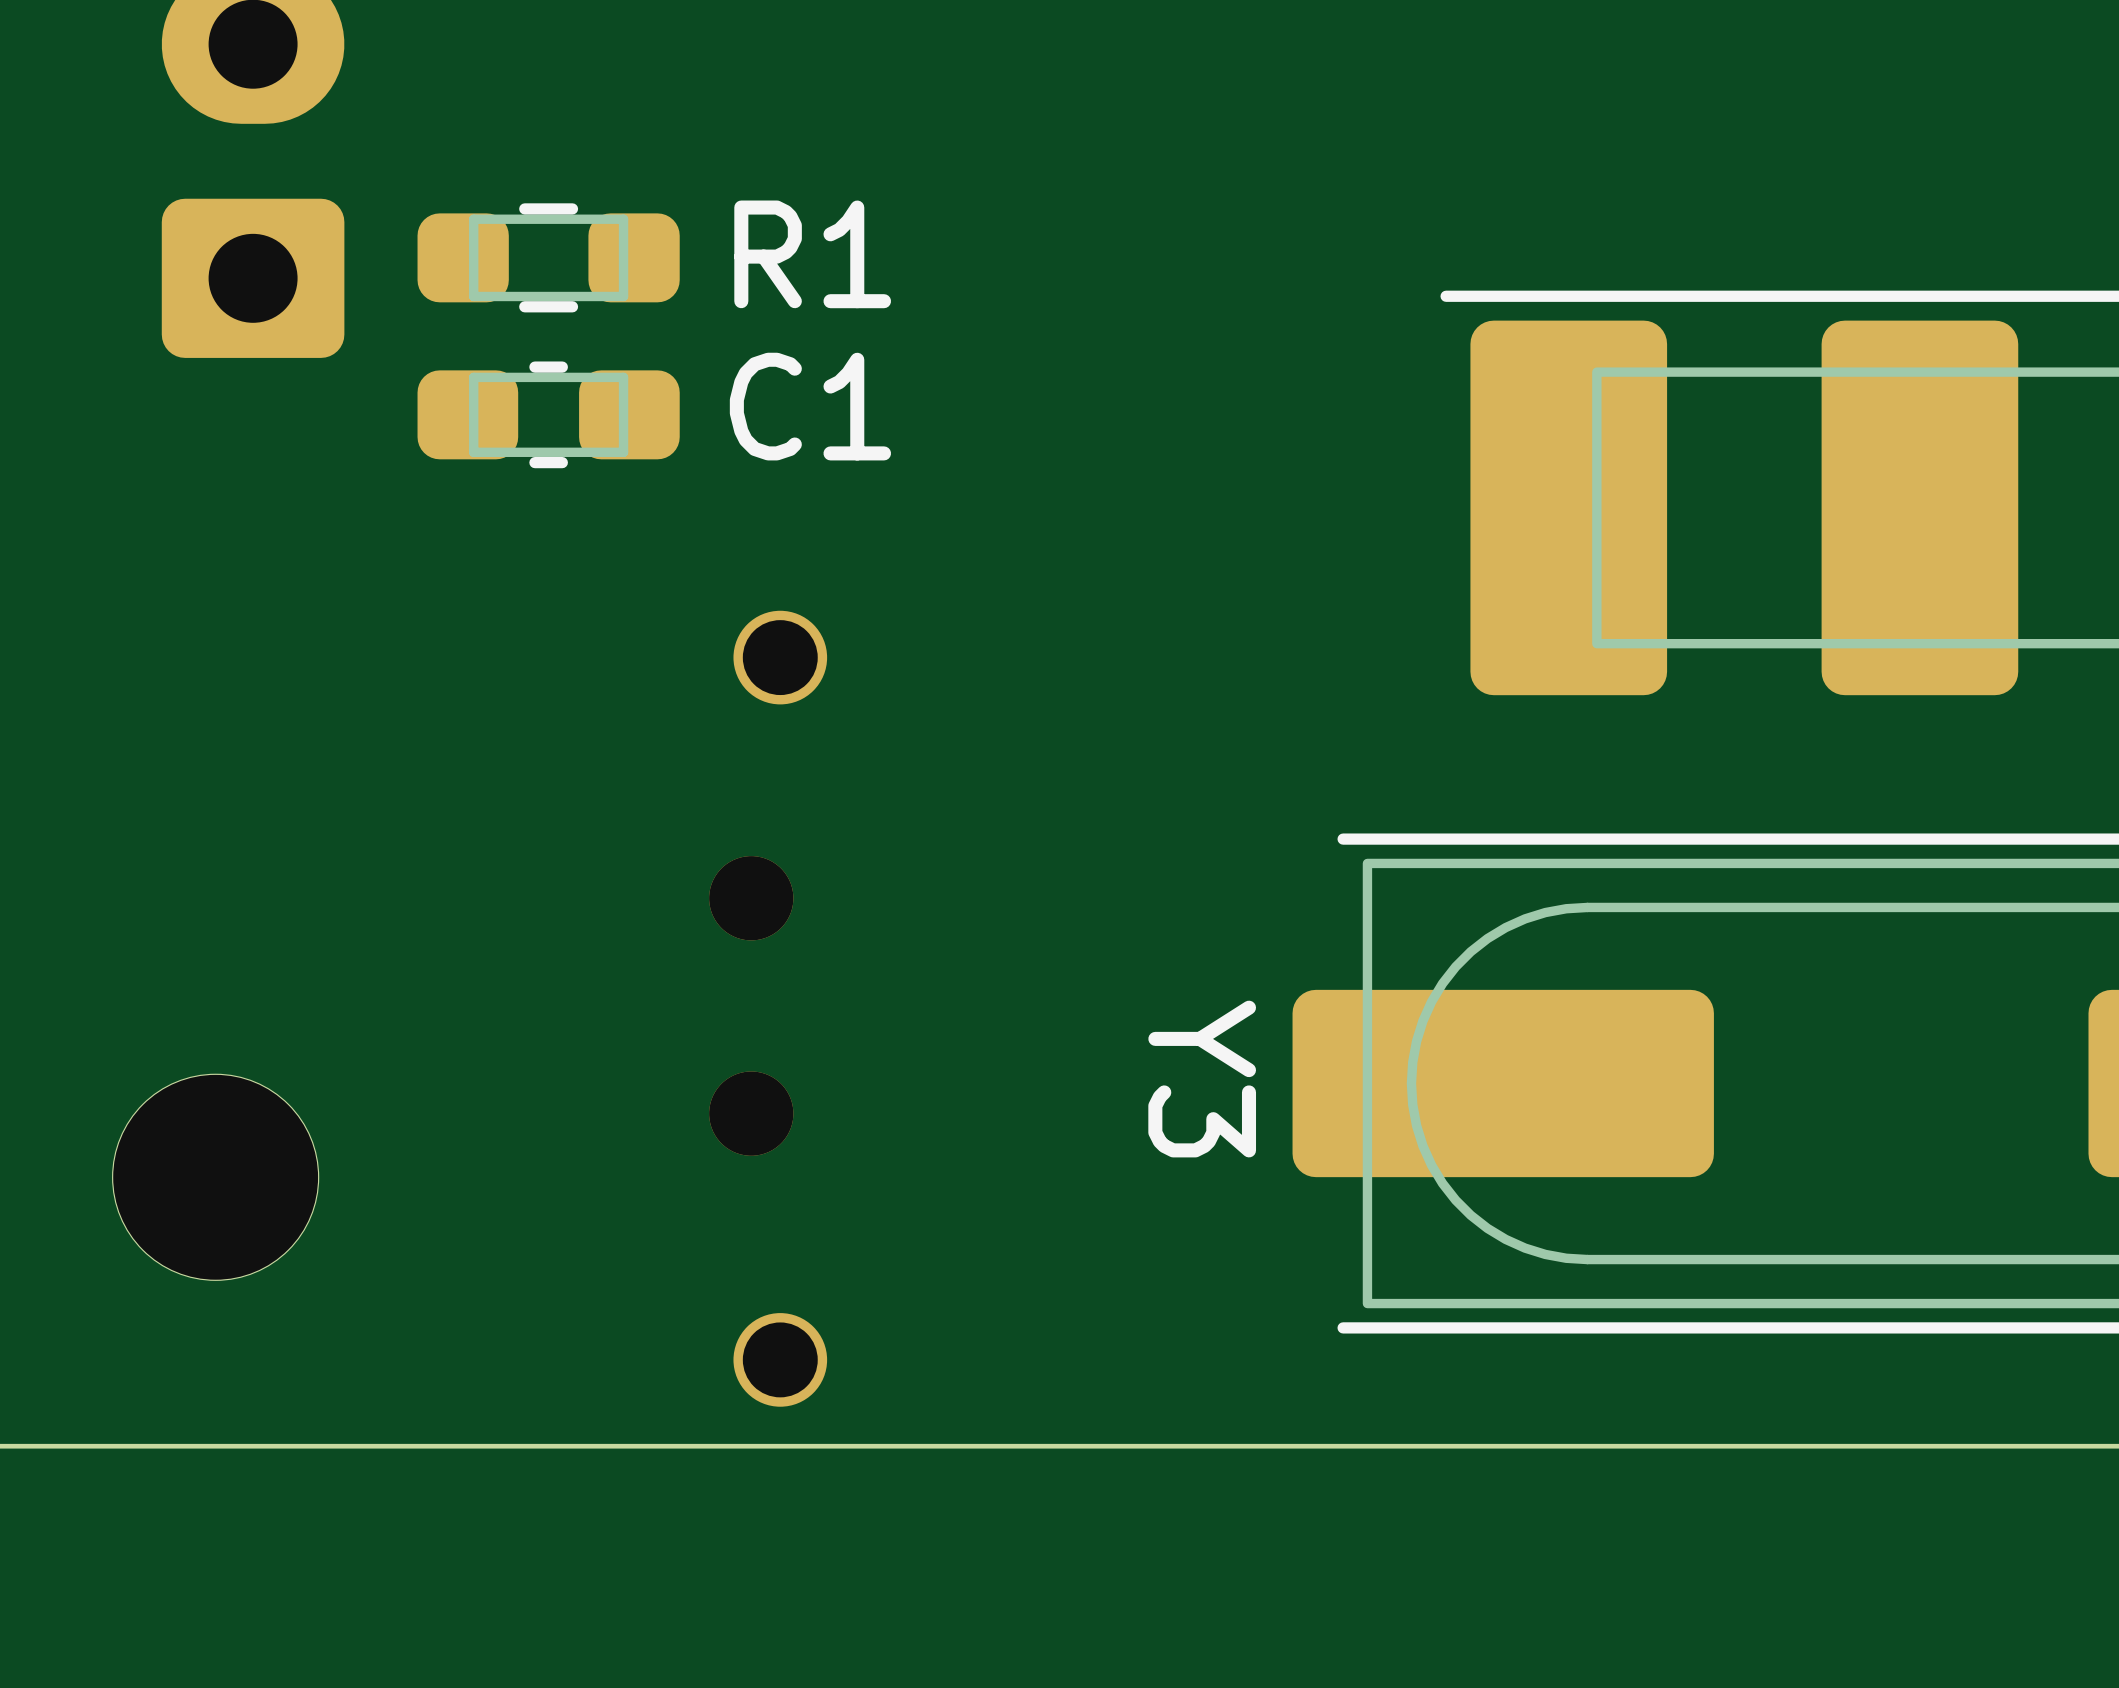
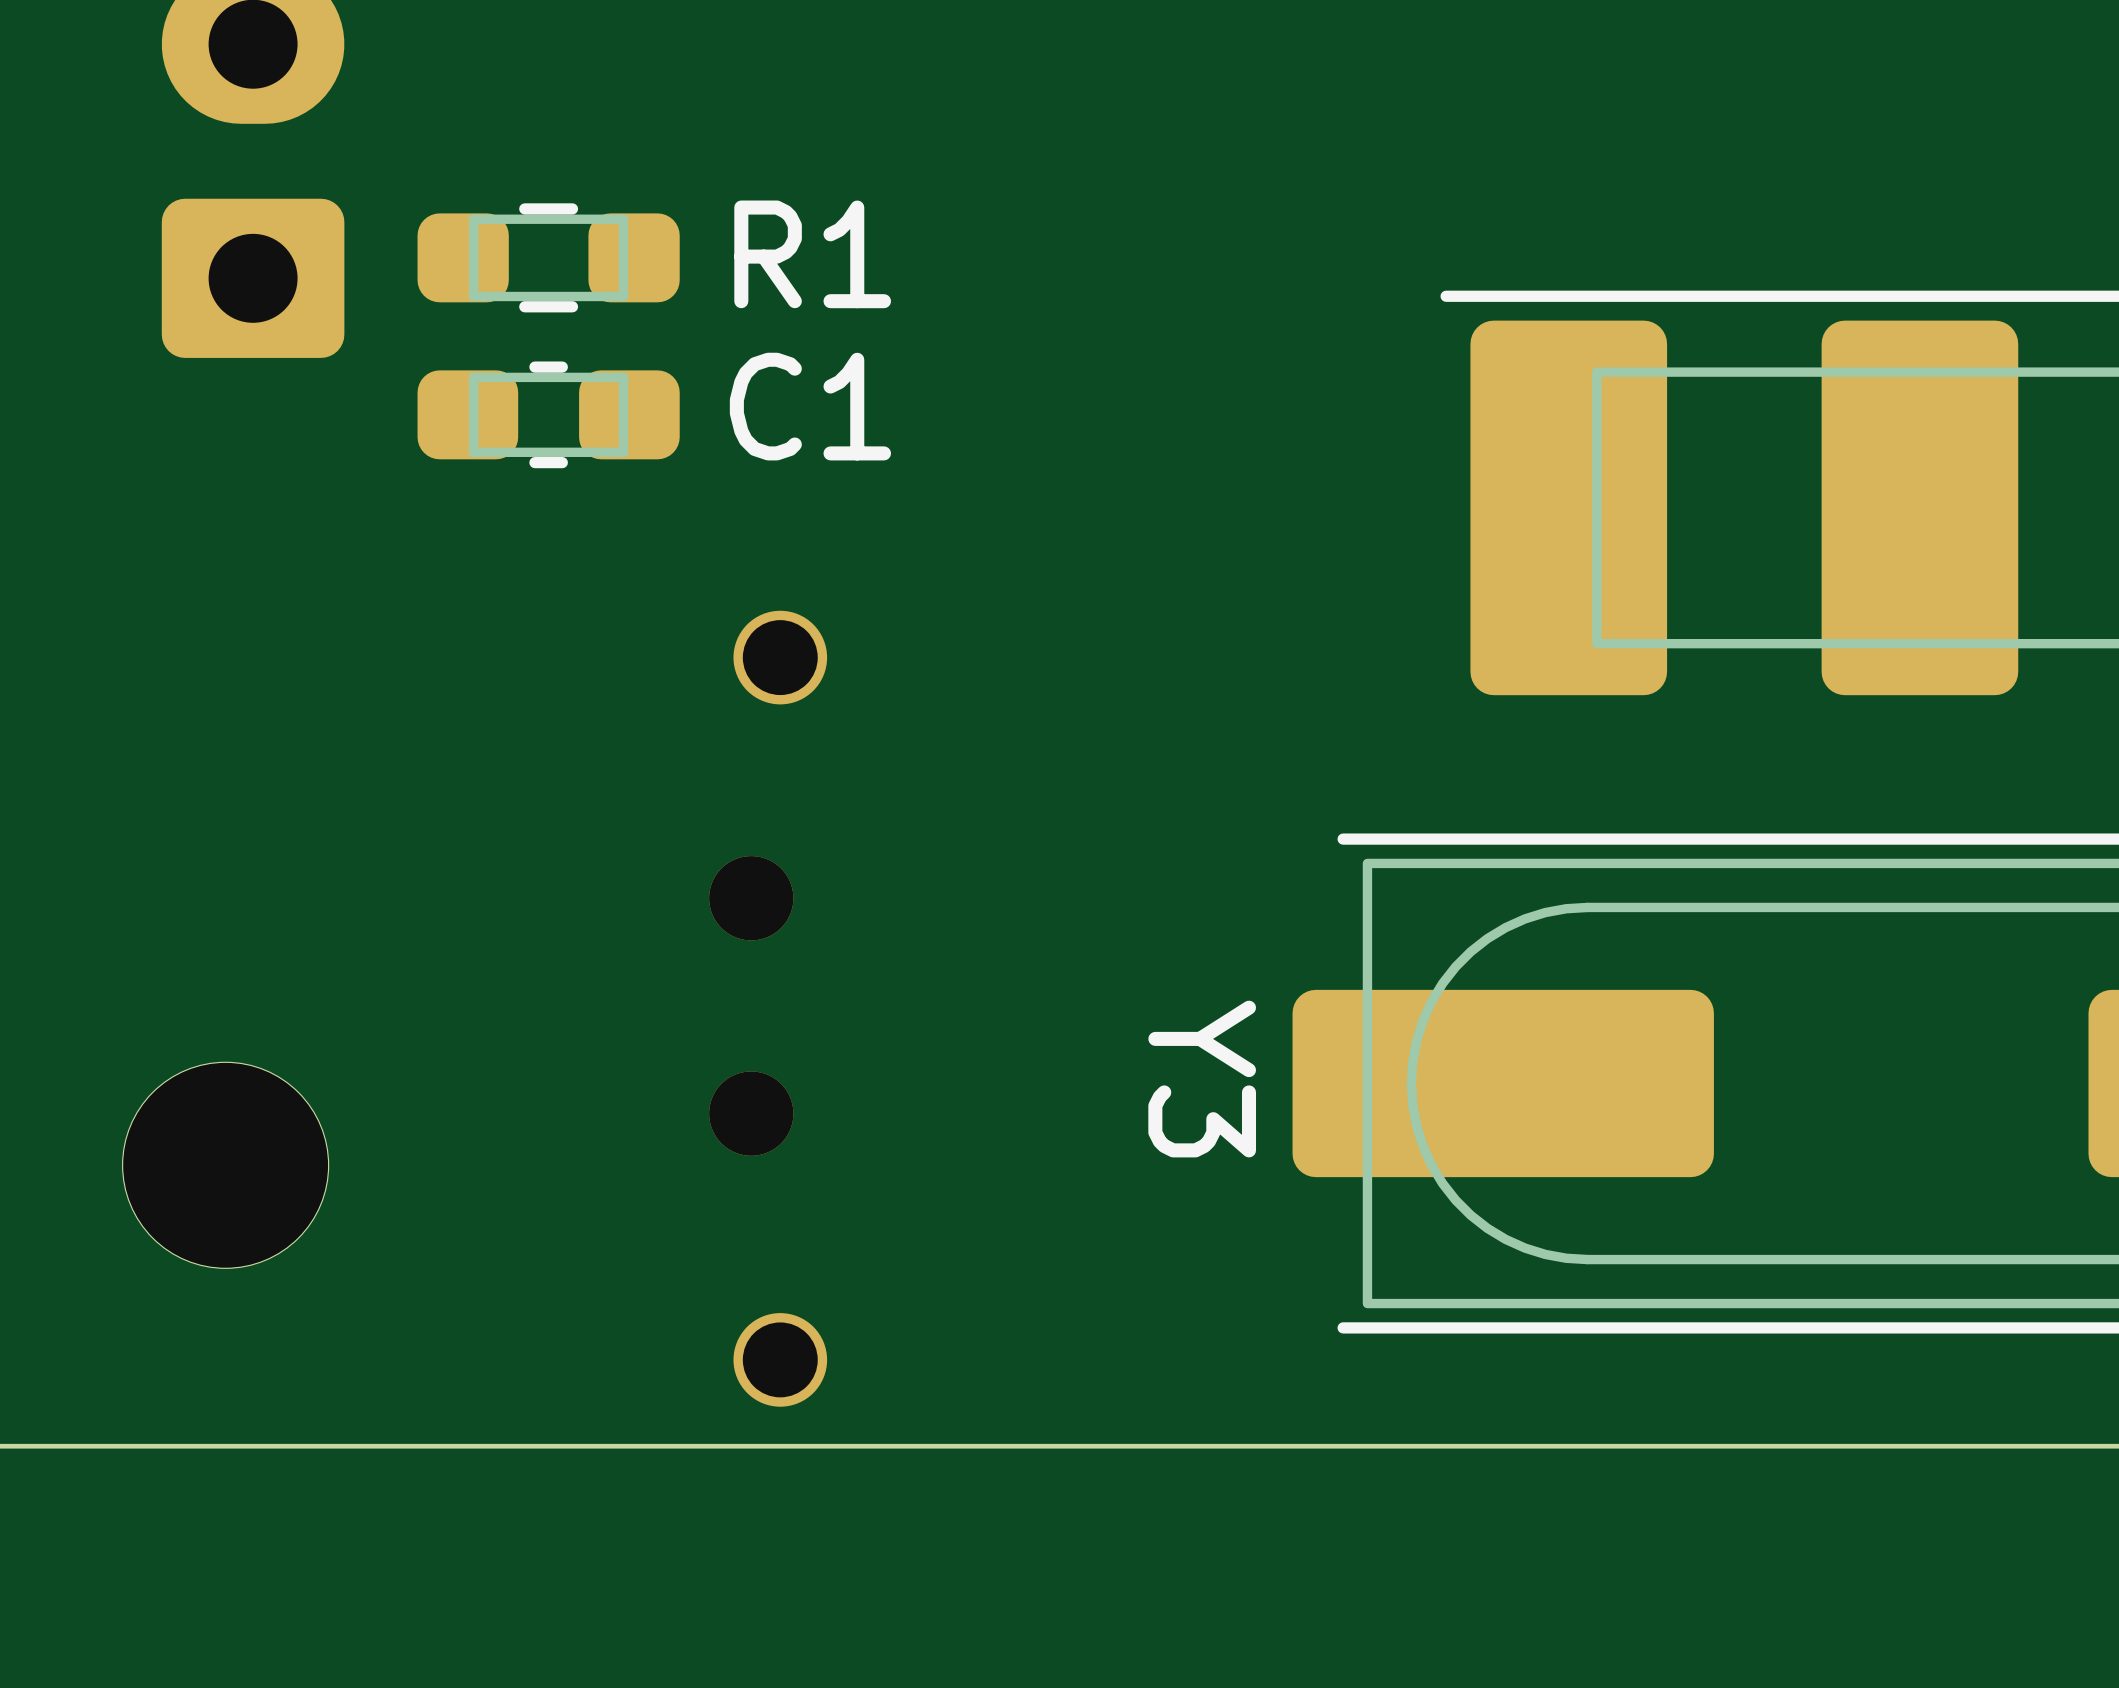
part position: (215, 1177) -> (225, 1165)

